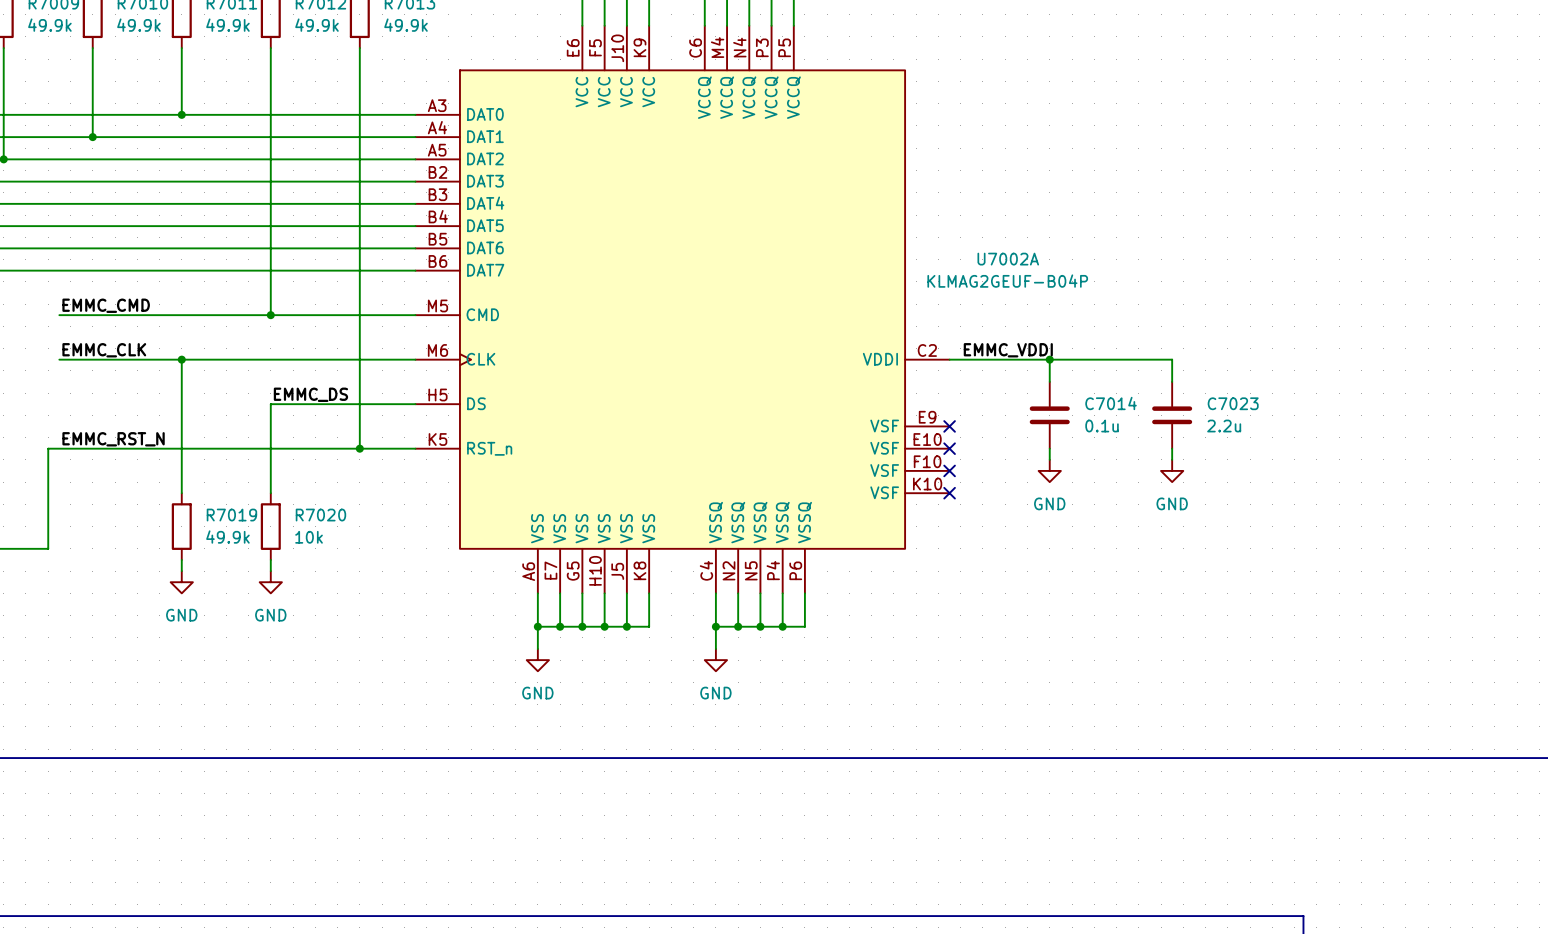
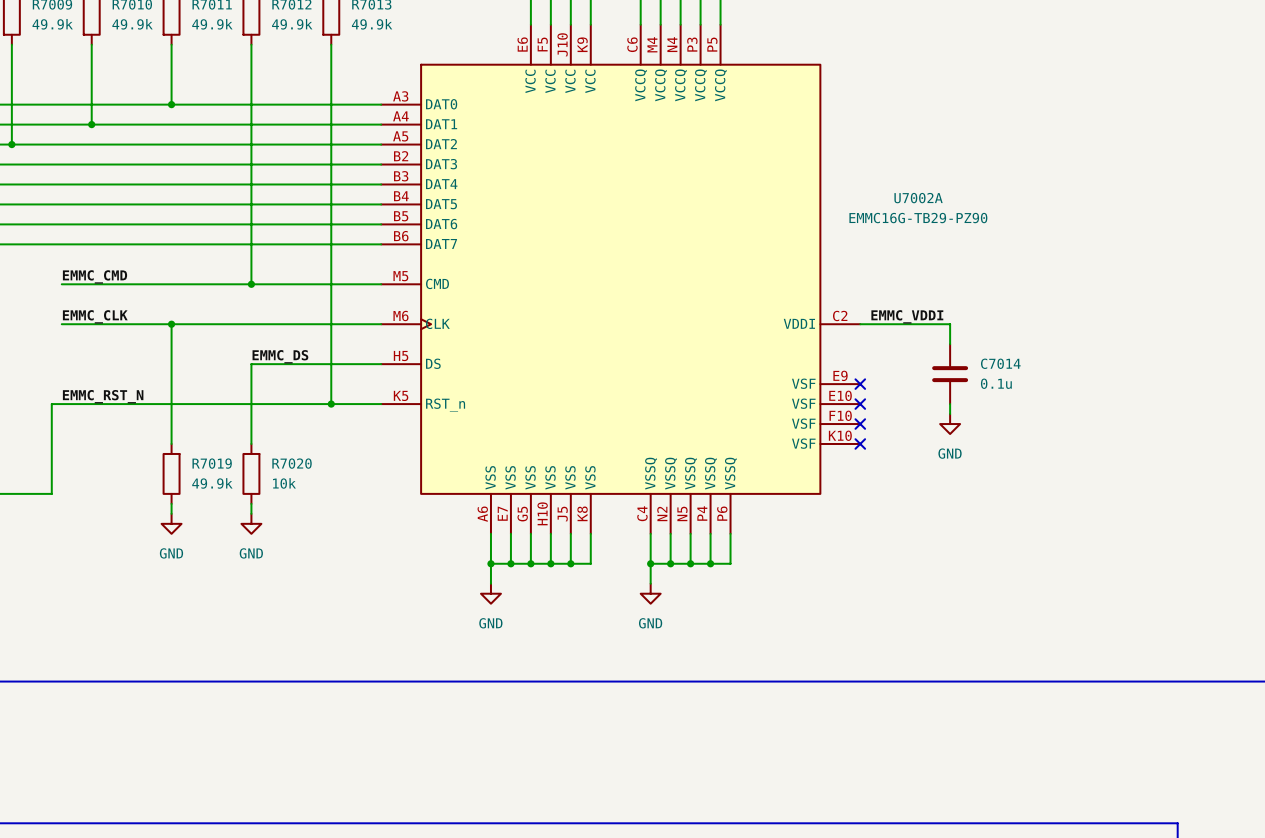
U7002A name position: U7002A (1008, 259) -> U7002A (918, 198)
U7002A value: KLMAG2GEUF-B04P (1007, 281) -> EMMC16G-TB29-PZ90 (918, 218)
wire: (1049, 359) (1172, 359) (1172, 381) -> none
junction: (1049, 359) -> none
C7023: 2.2u (1172, 415) -> none
wire: (1172, 448) (1172, 459) -> none
power symbol: GND (1172, 470) -> none

